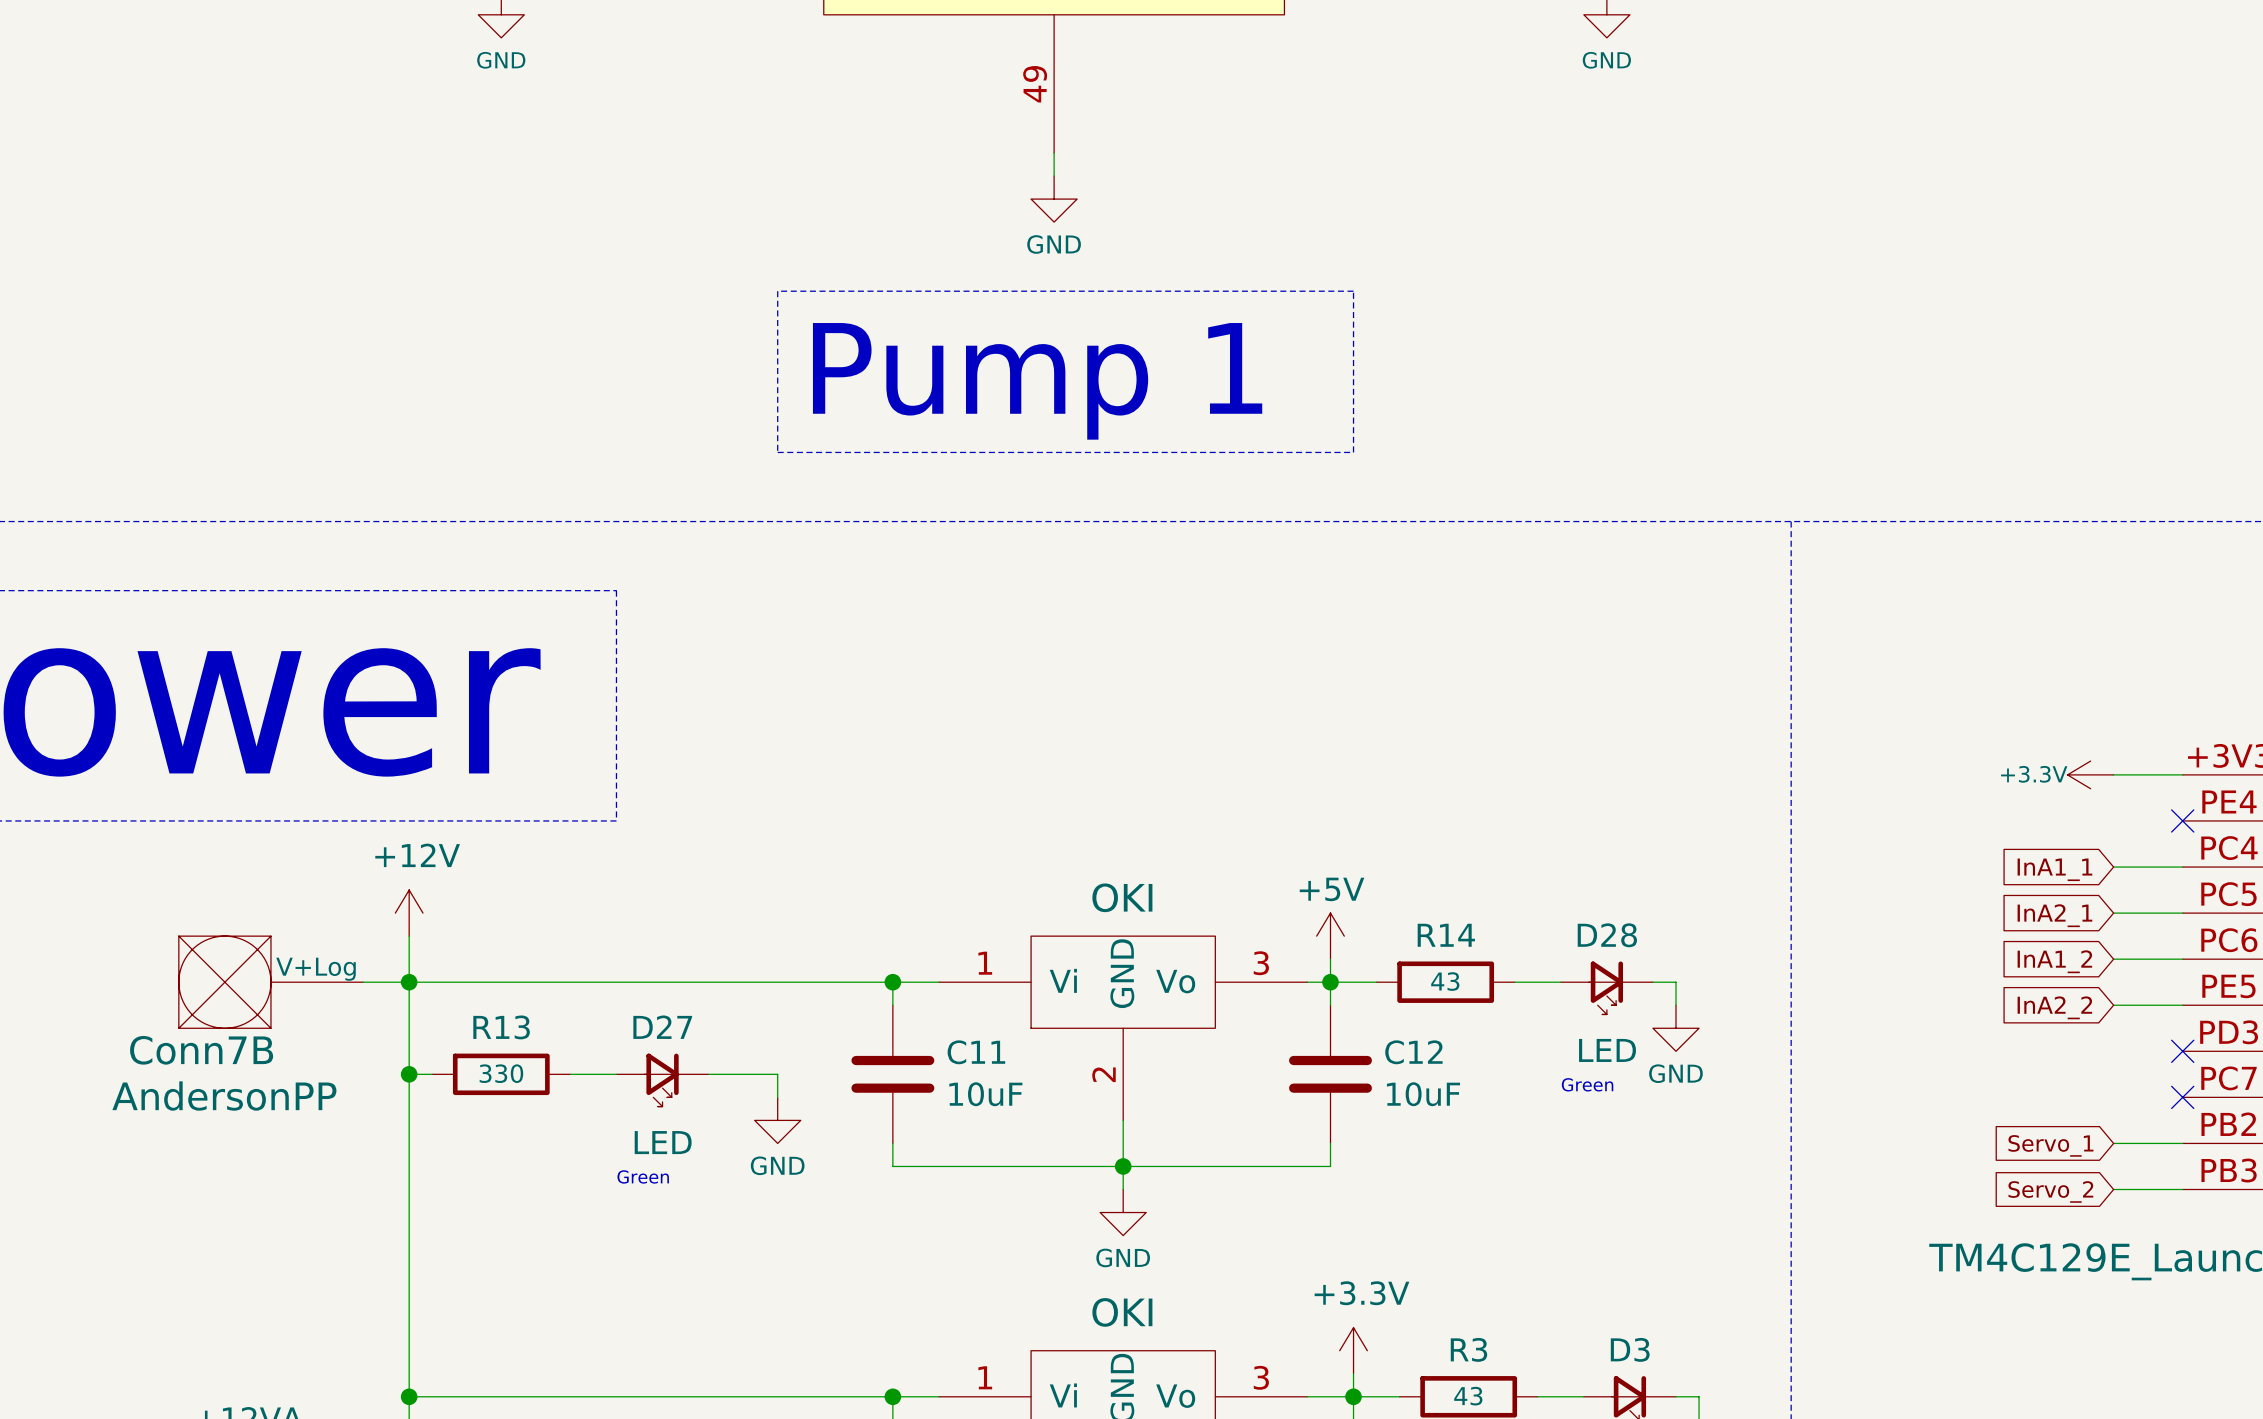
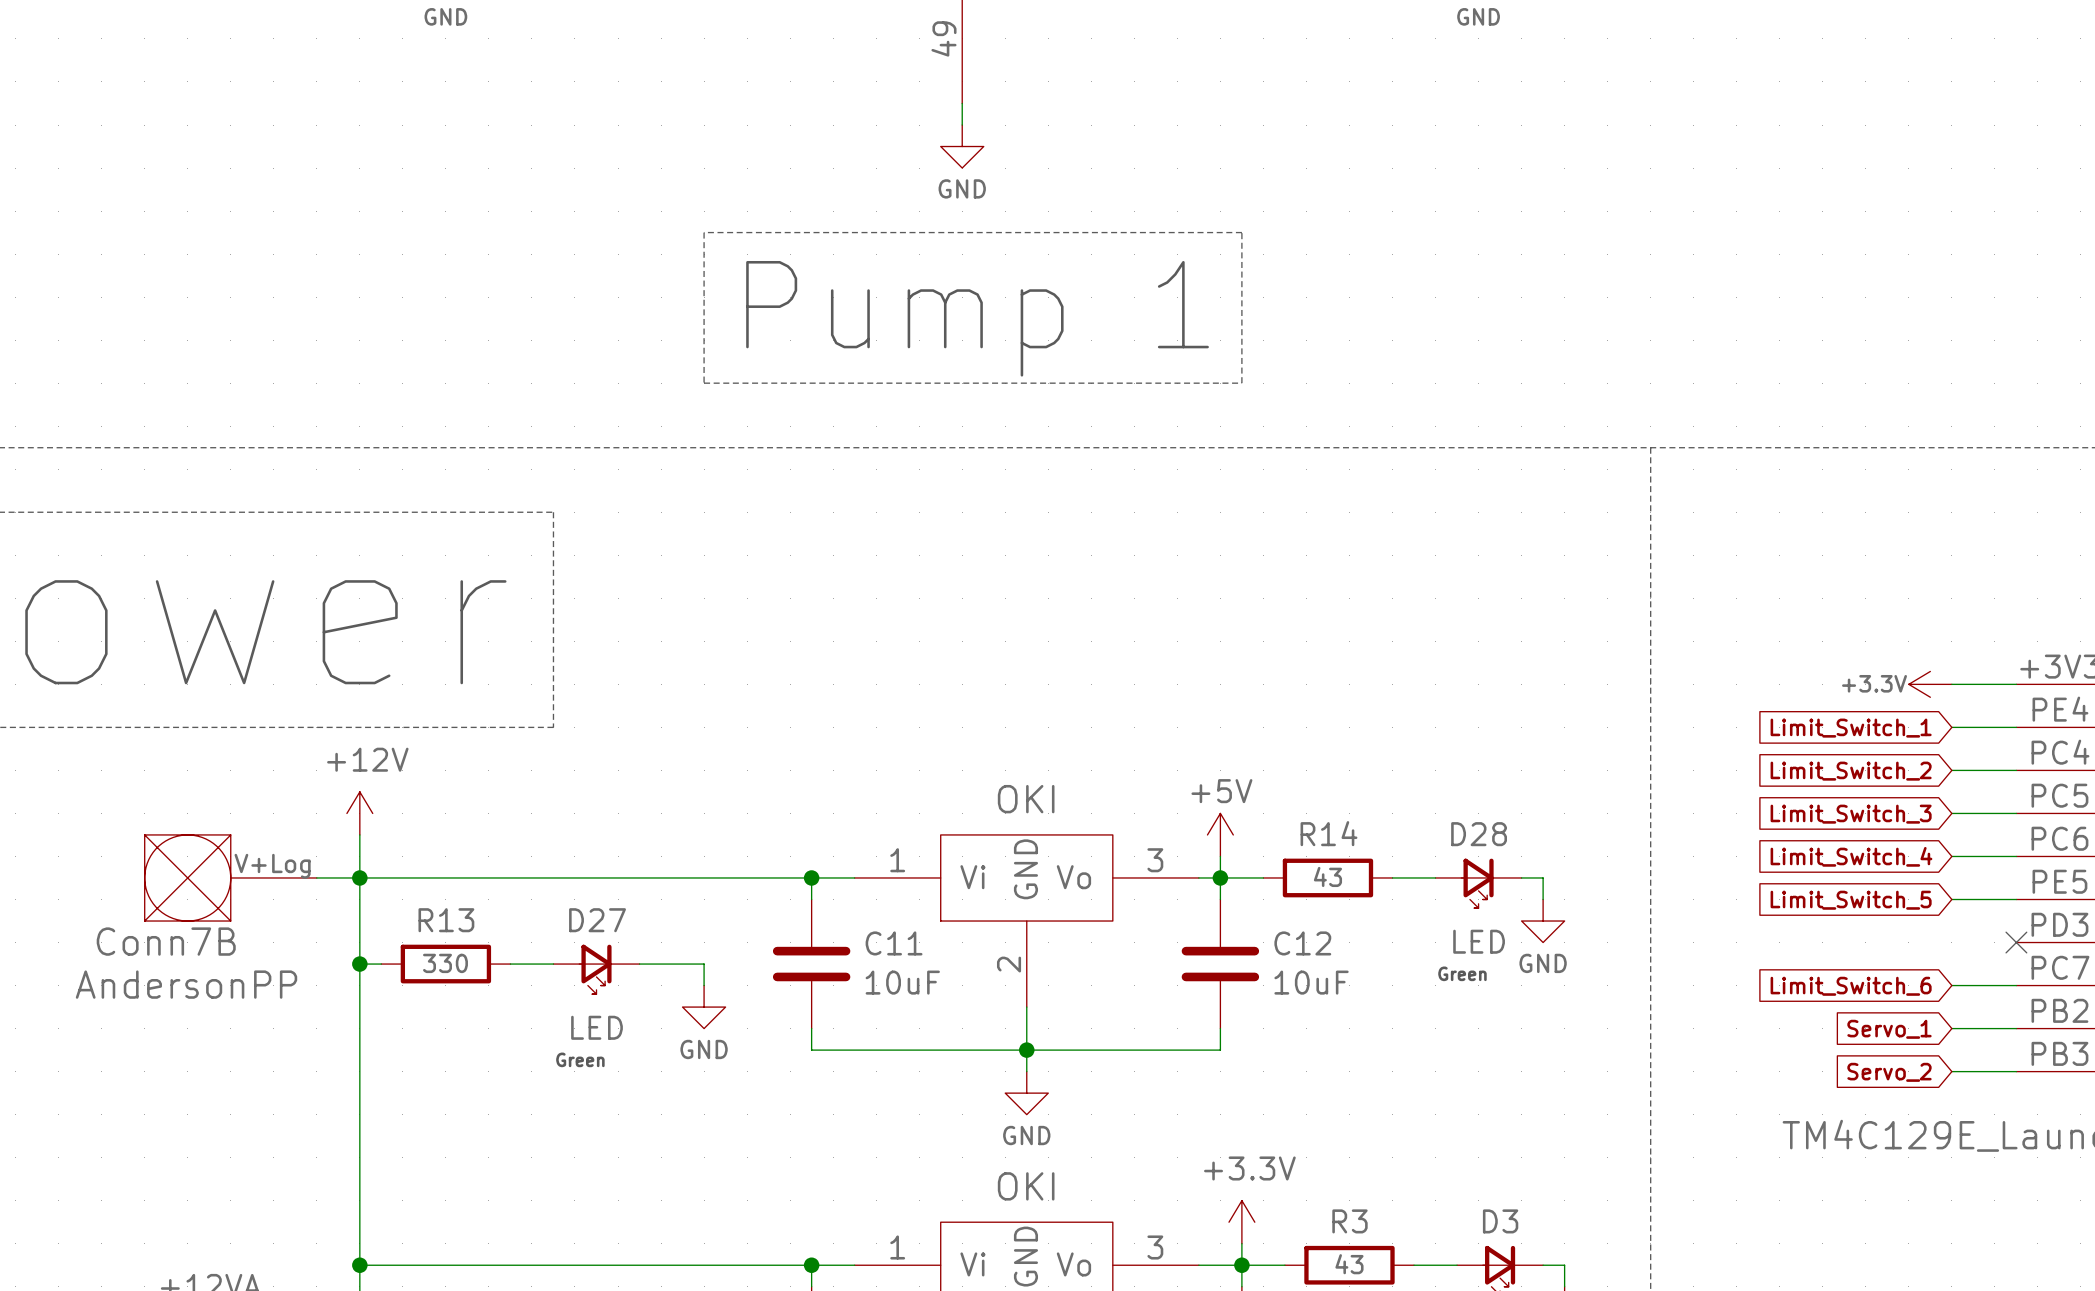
wire: none -> (1951, 727) (2016, 727)
no-connect mark: (2182, 820) -> none
global label: none -> Limit_Switch_1 (1851, 728)
global label: InA1_1 (2054, 869) -> Limit_Switch_2 (1851, 771)
global label: InA2_1 (2054, 915) -> Limit_Switch_3 (1851, 814)
global label: InA1_2 (2054, 961) -> Limit_Switch_4 (1851, 856)
global label: InA2_2 (2054, 1007) -> Limit_Switch_5 (1851, 900)
wire: none -> (1951, 985) (2016, 985)
no-connect mark: (2182, 1097) -> none
global label: none -> Limit_Switch_6 (1851, 986)

